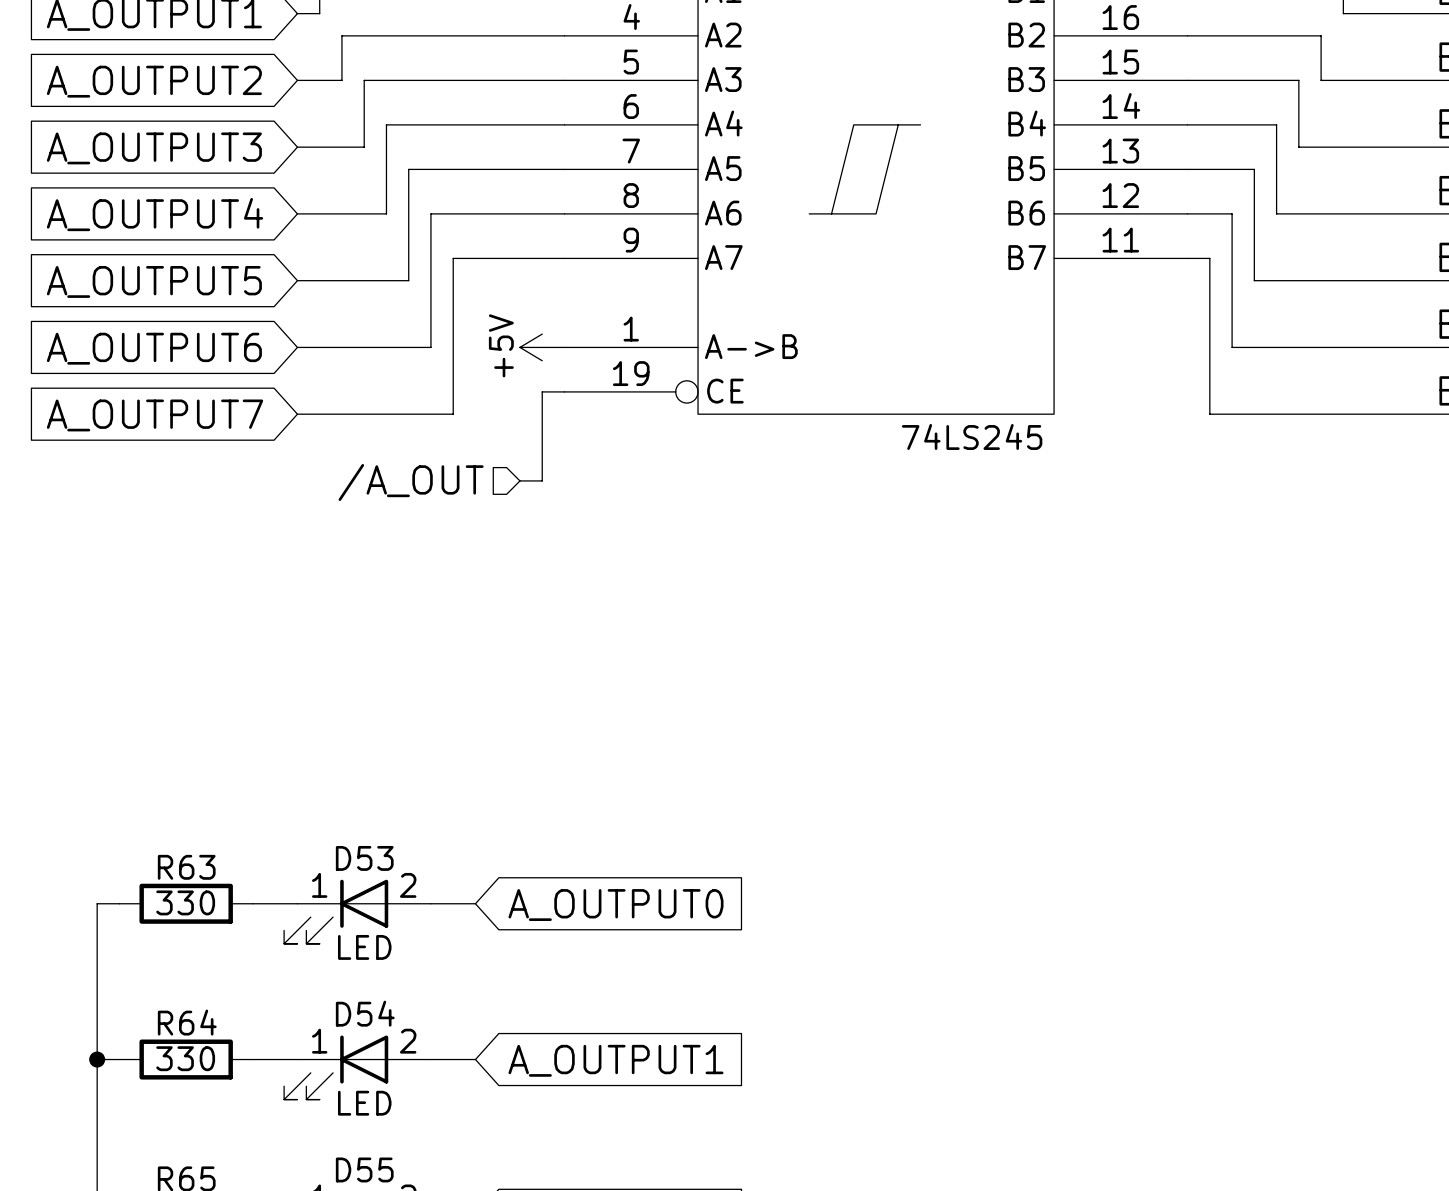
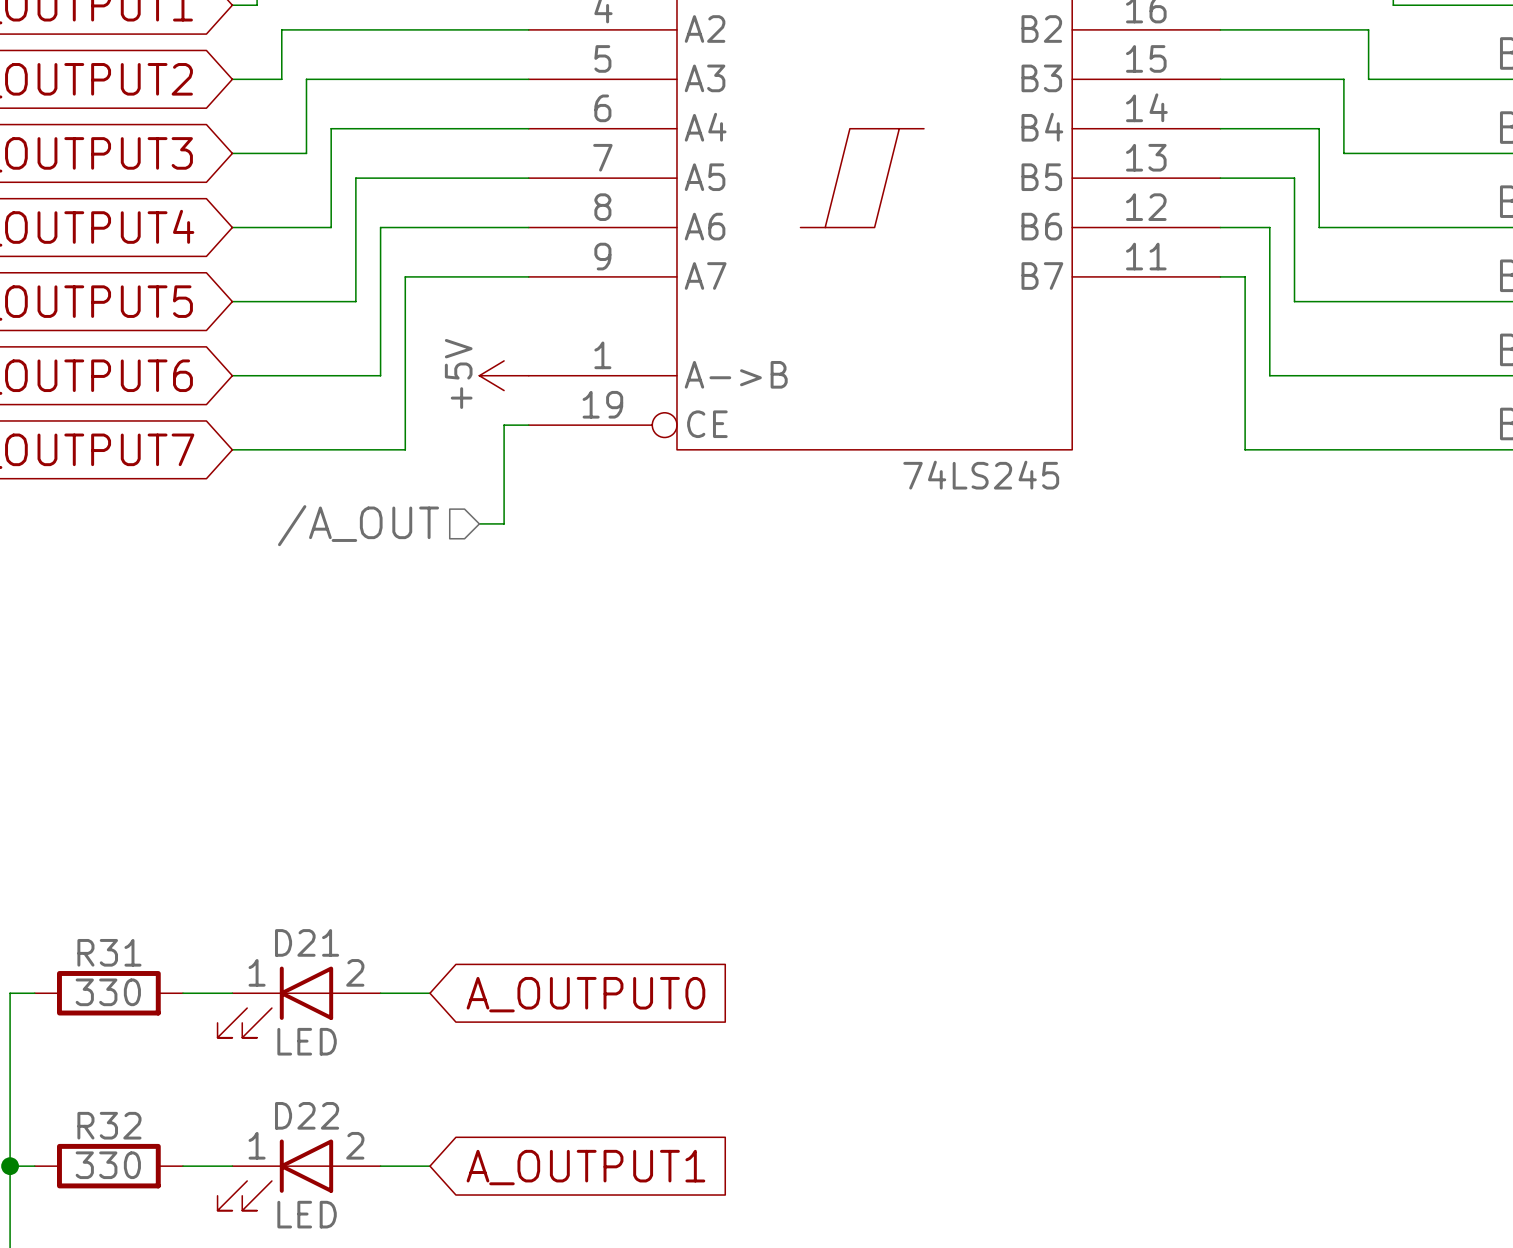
D53 name: D53 (364, 858) -> D21 (307, 942)
R63 name: R63 (186, 867) -> R31 (109, 952)
D54 name: D54 (365, 1013) -> D22 (307, 1115)
R64 name: R64 (187, 1022) -> R32 (109, 1125)

